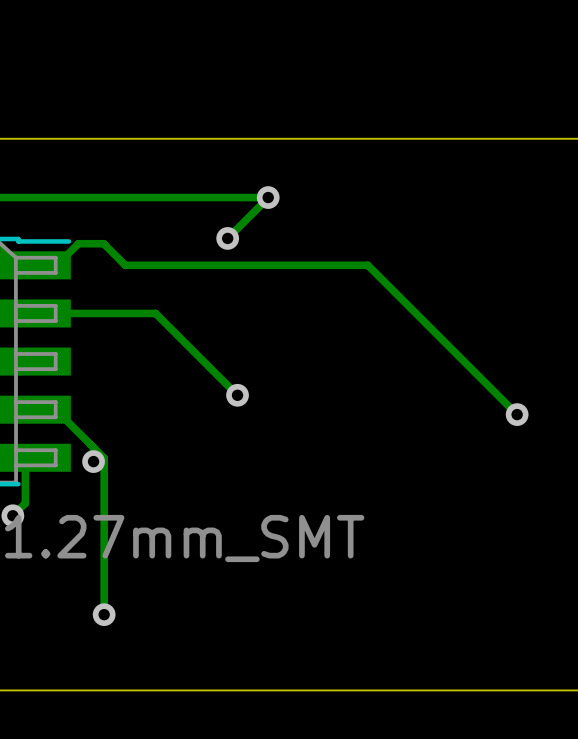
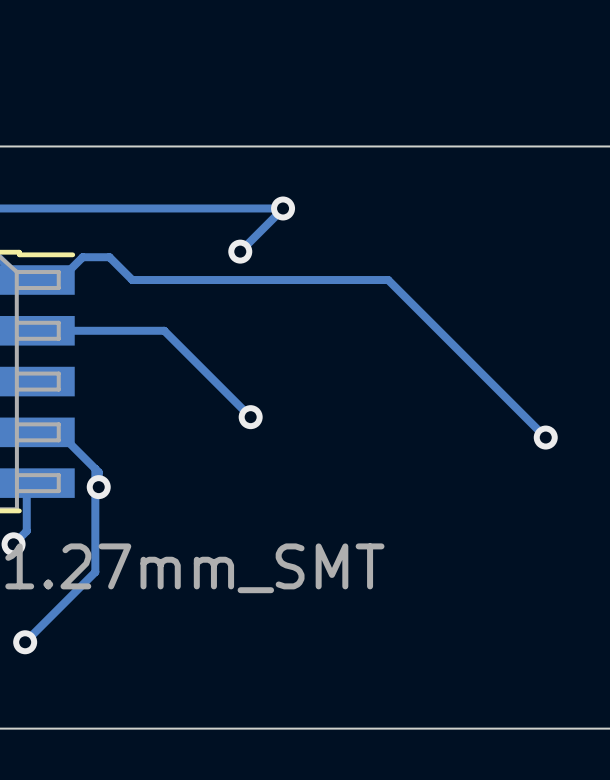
track: none -> (95, 468) (95, 572) (25, 642)
track: (93, 447) (104, 458) (104, 614) -> none
via position: (104, 614) -> (25, 642)

